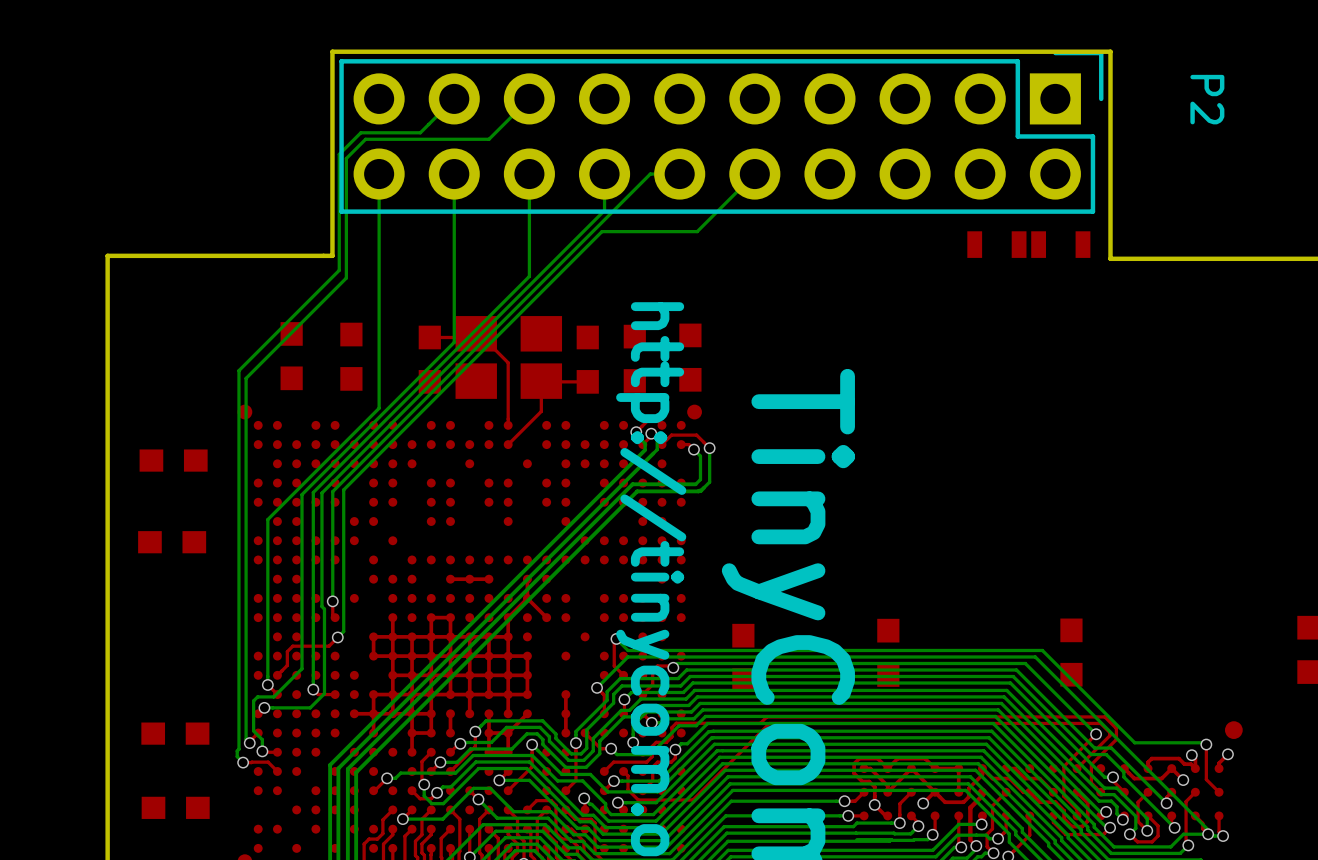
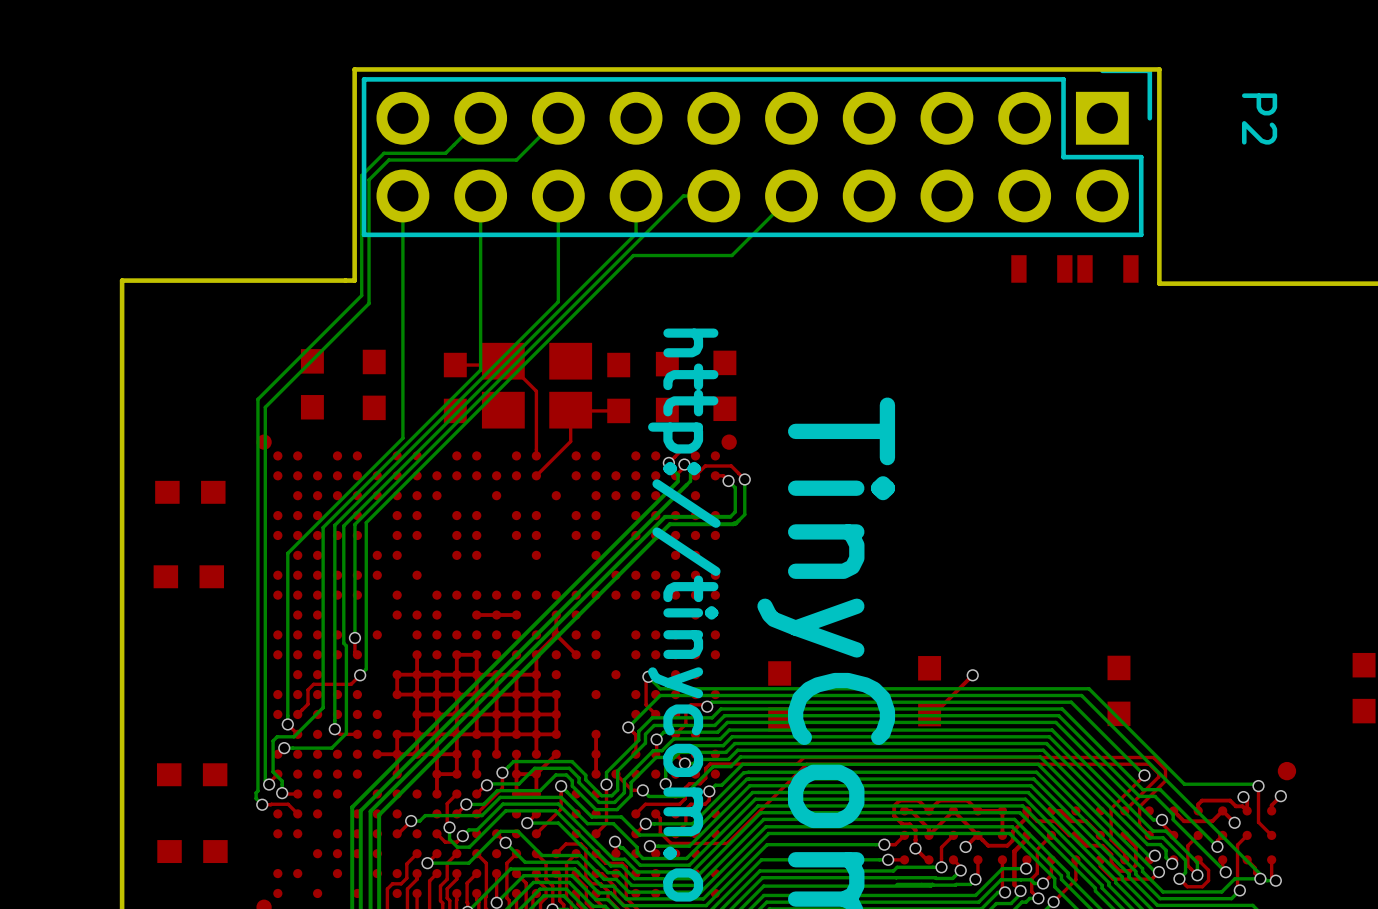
top track: none -> (972, 675) (933, 714) (929, 714)
via: none -> (972, 675)

